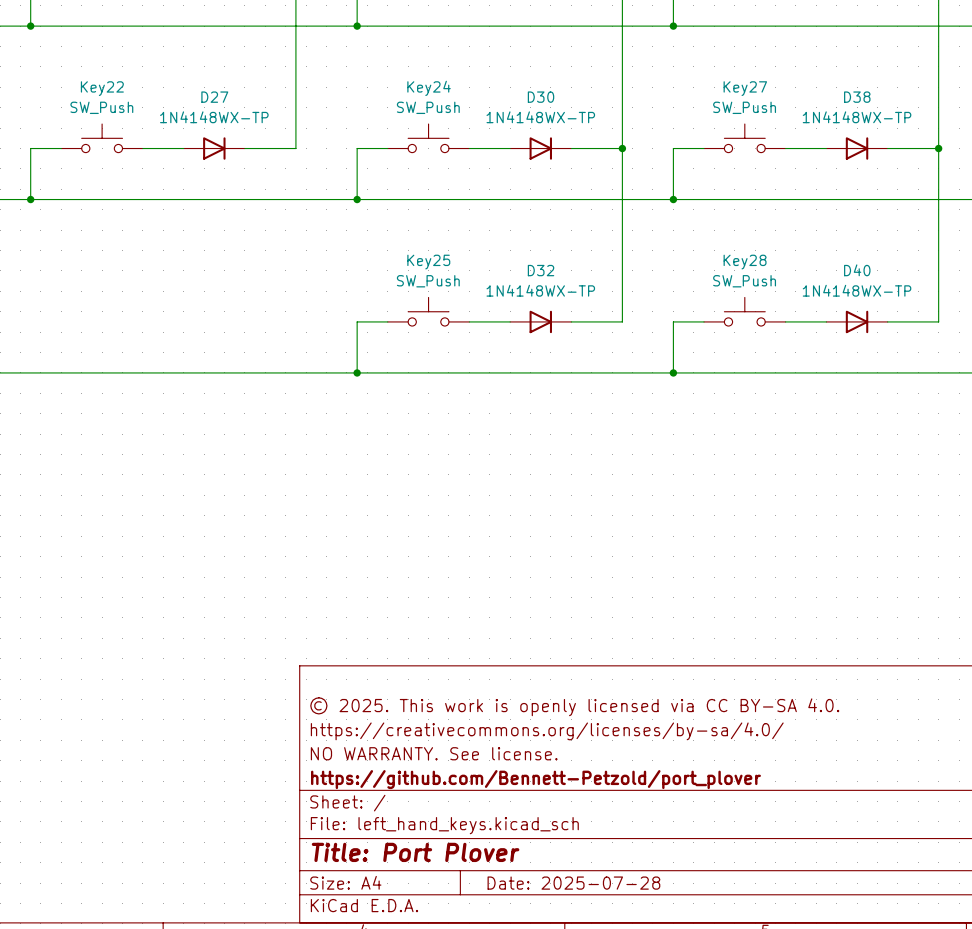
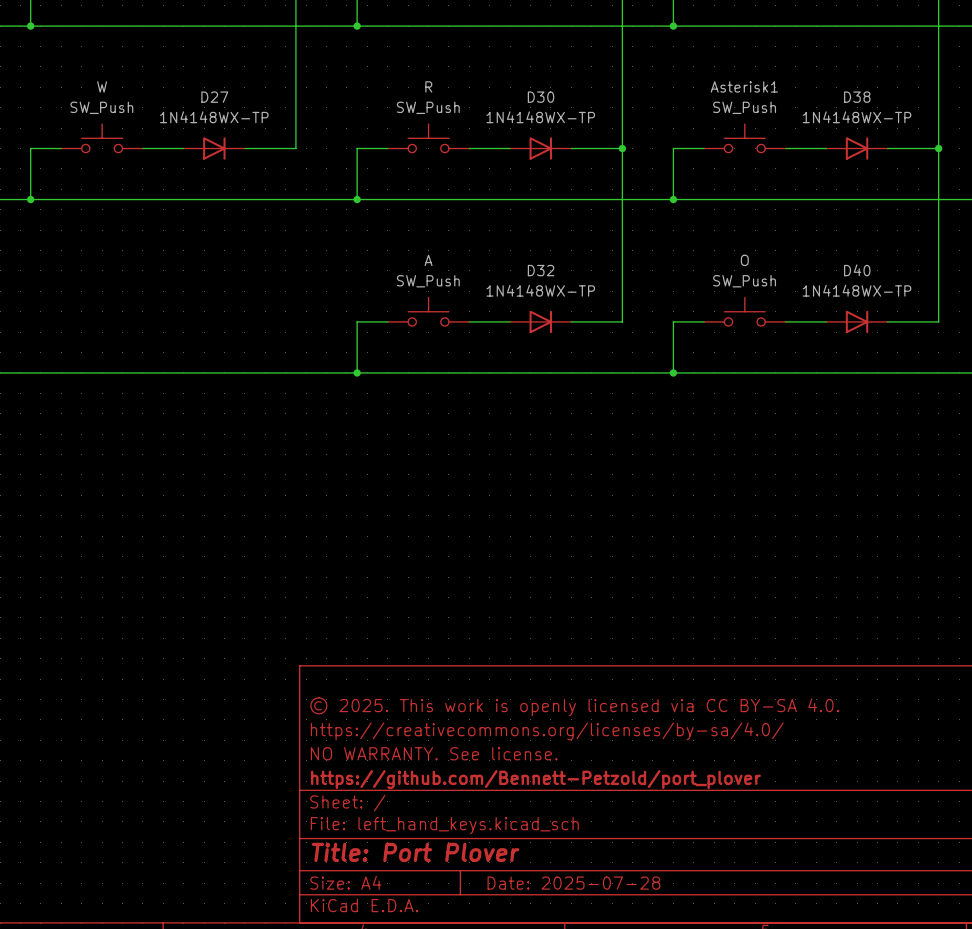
Key22 name: Key22 (102, 88) -> W (102, 86)
Key24 name: Key24 (429, 88) -> R (428, 86)
Key27 name: Key27 (745, 88) -> Asterisk1 (744, 86)
Key25 name: Key25 (428, 262) -> A (428, 260)
Key28 name: Key28 (745, 262) -> O (744, 260)

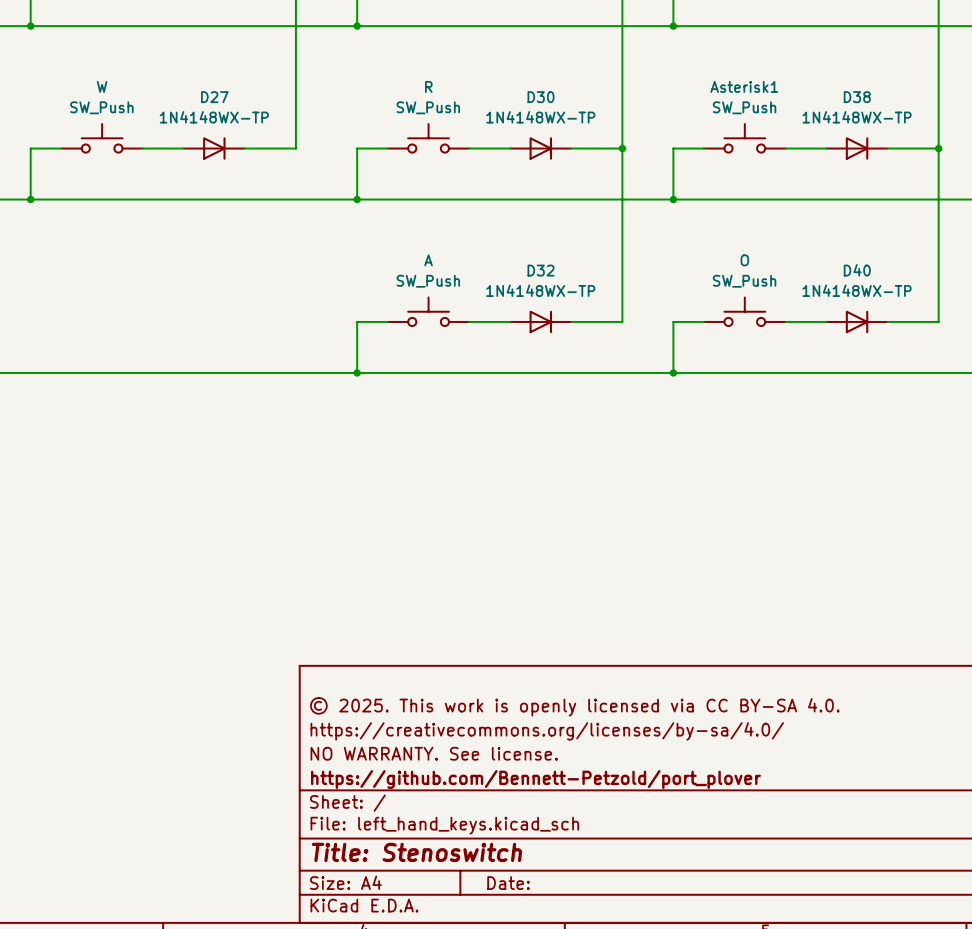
title block: Title: Port Plover (415, 852) -> Title: Stenoswitch (416, 852)
title block: Date: 2025-07-28 (573, 883) -> Date: (508, 883)

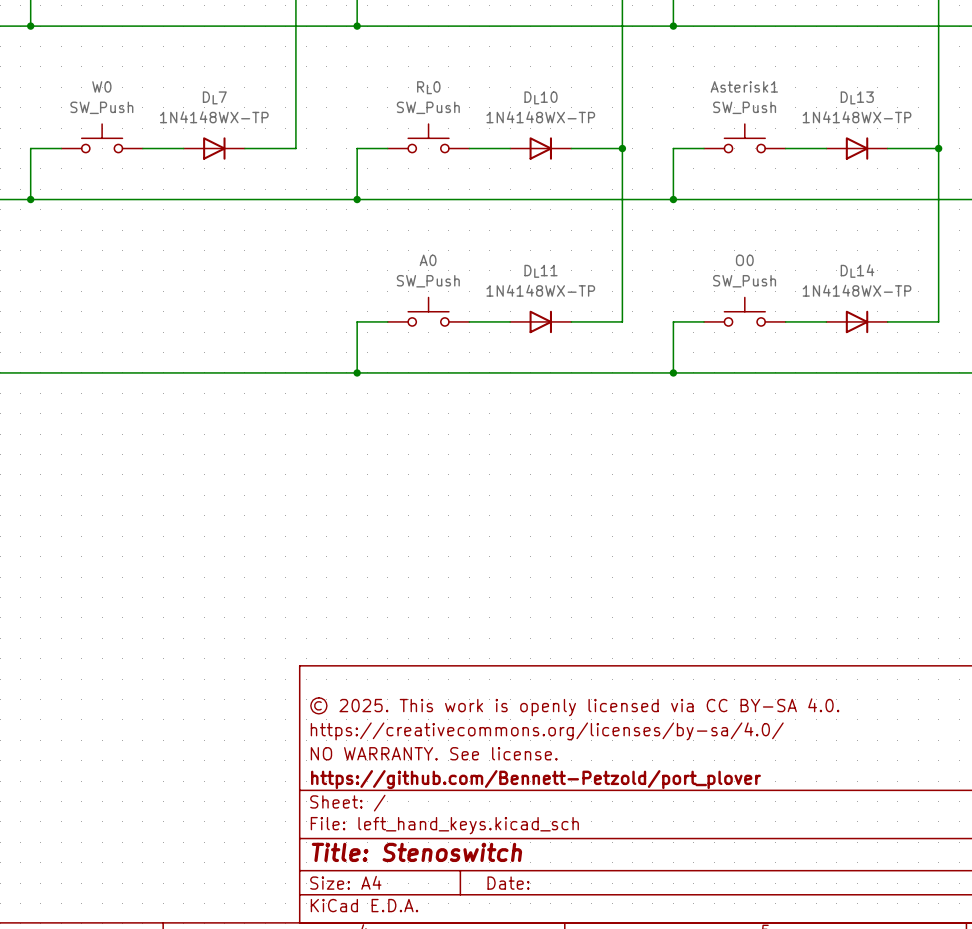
W name: W (102, 86) -> W0 (101, 86)
R name: R (428, 86) -> RL0 (428, 87)
D27 name: D27 (214, 97) -> DL7 (214, 97)
D30 name: D30 (541, 97) -> DL10 (541, 97)
D38 name: D38 (857, 97) -> DL13 (857, 97)
A name: A (428, 260) -> A0 (428, 260)
O name: O (744, 260) -> O0 (744, 260)
D32 name: D32 (541, 270) -> DL11 (541, 271)
D40 name: D40 (857, 270) -> DL14 (857, 271)

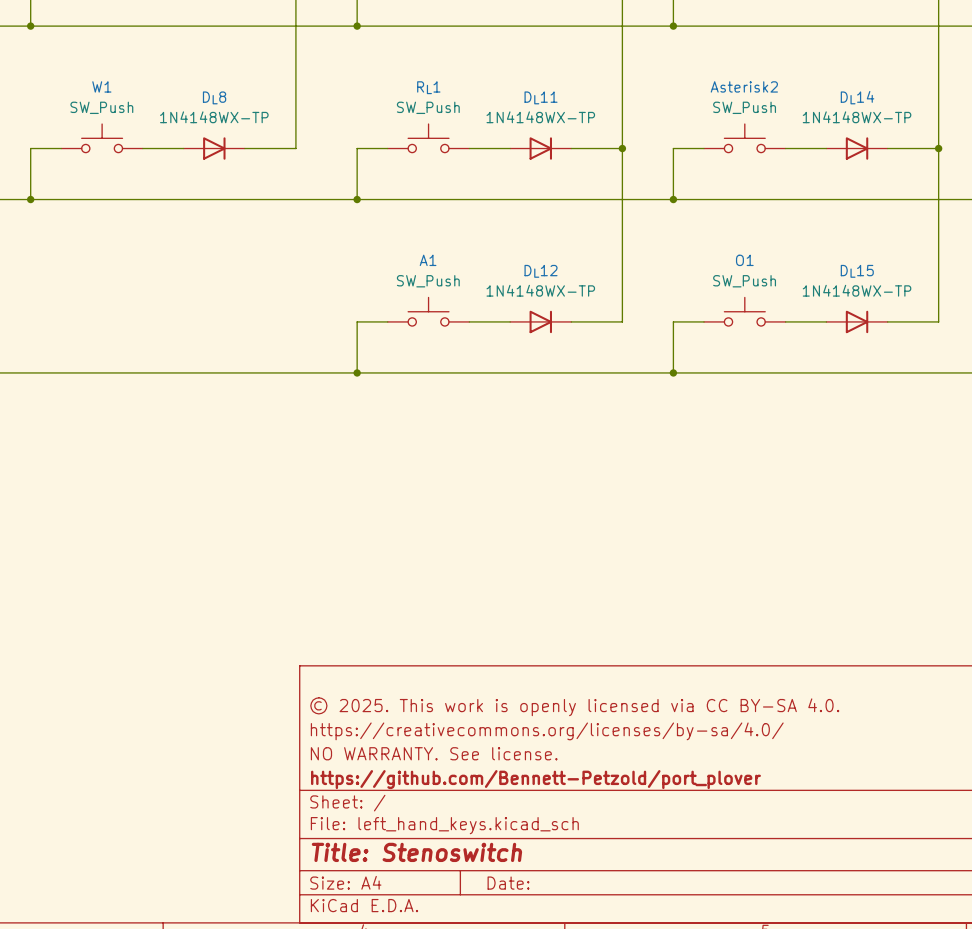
W0 name: W0 (101, 86) -> W1 (101, 86)
Asterisk1 name: Asterisk1 (744, 86) -> Asterisk2 (744, 86)
RL0 name: RL0 (428, 87) -> RL1 (428, 87)
DL7 name: DL7 (214, 97) -> DL8 (214, 97)
DL10 name: DL10 (541, 97) -> DL11 (541, 97)
DL13 name: DL13 (857, 97) -> DL14 (857, 97)
A0 name: A0 (428, 260) -> A1 (428, 260)
O0 name: O0 (744, 260) -> O1 (744, 260)
DL11 name: DL11 (541, 271) -> DL12 (541, 271)
DL14 name: DL14 (857, 271) -> DL15 (857, 271)

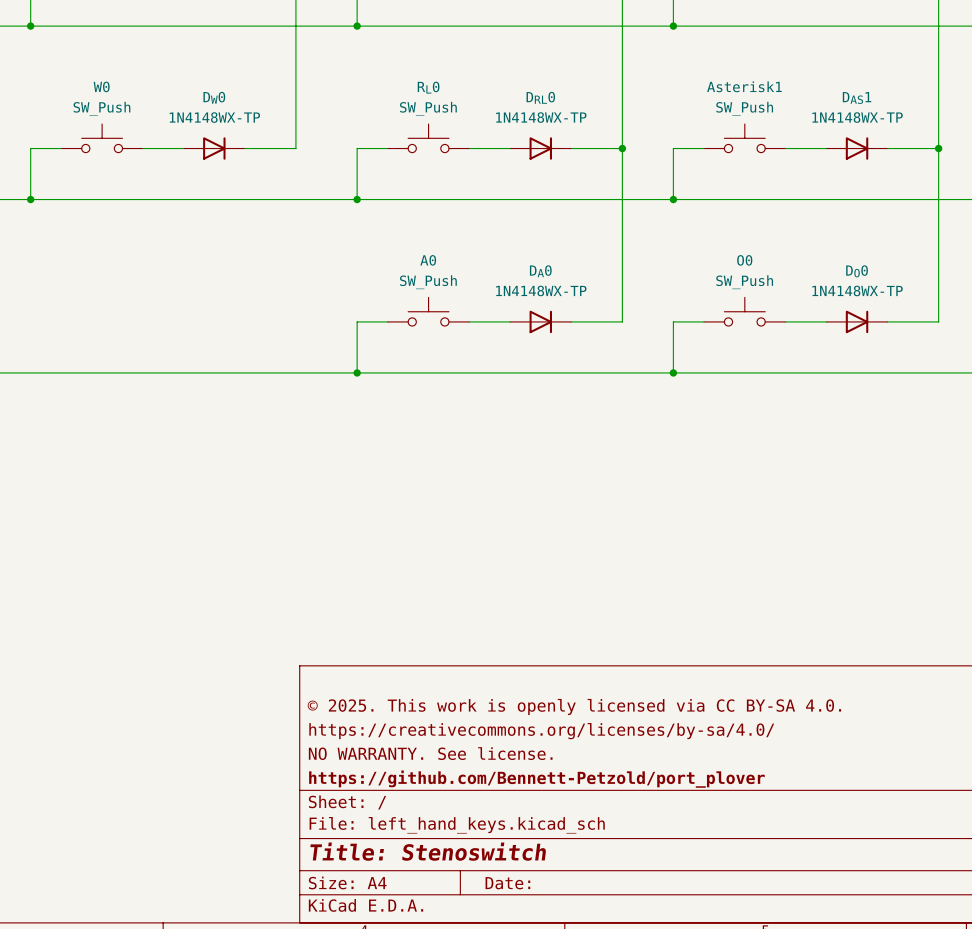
W1 name: W1 (101, 86) -> W0 (101, 86)
Asterisk2 name: Asterisk2 (744, 86) -> Asterisk1 (744, 86)
RL1 name: RL1 (428, 87) -> RL0 (428, 87)
DL8 name: DL8 (214, 97) -> DW0 (214, 97)
DL11 name: DL11 (541, 97) -> DRL0 (540, 97)
DL14 name: DL14 (857, 97) -> DAS1 (857, 97)
A1 name: A1 (428, 260) -> A0 (428, 260)
O1 name: O1 (744, 260) -> O0 (744, 260)
DL12 name: DL12 (541, 271) -> DA0 (540, 271)
DL15 name: DL15 (857, 271) -> DO0 (857, 271)

